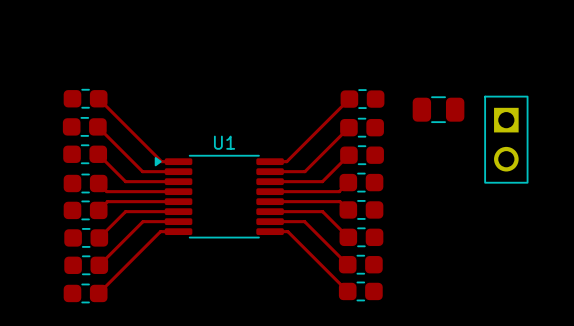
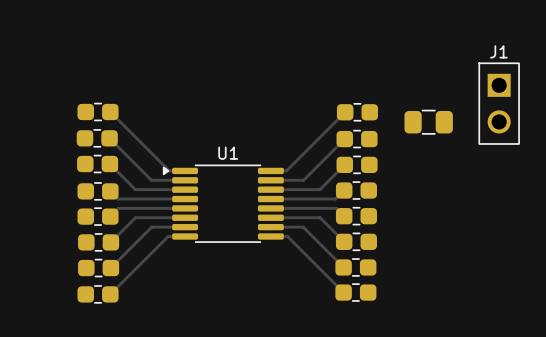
J1: none -> (499, 103)
part: (506, 139) -> none

